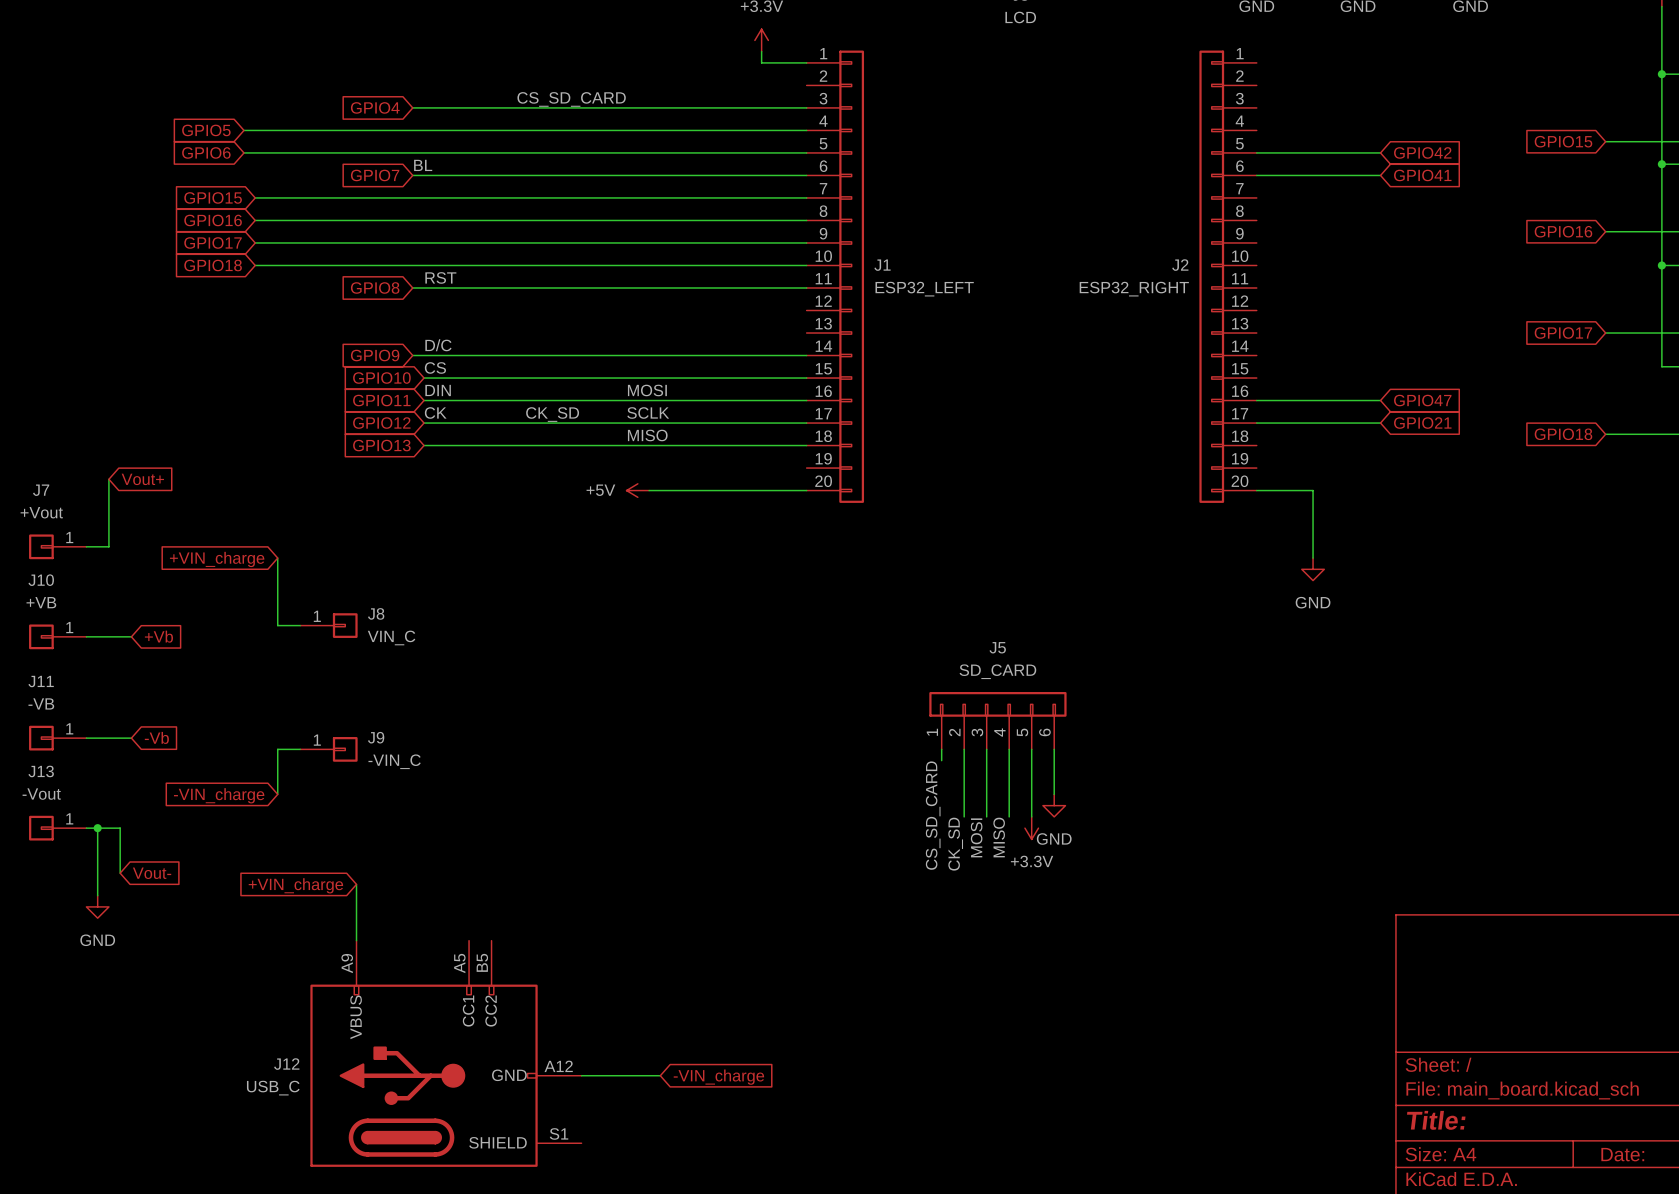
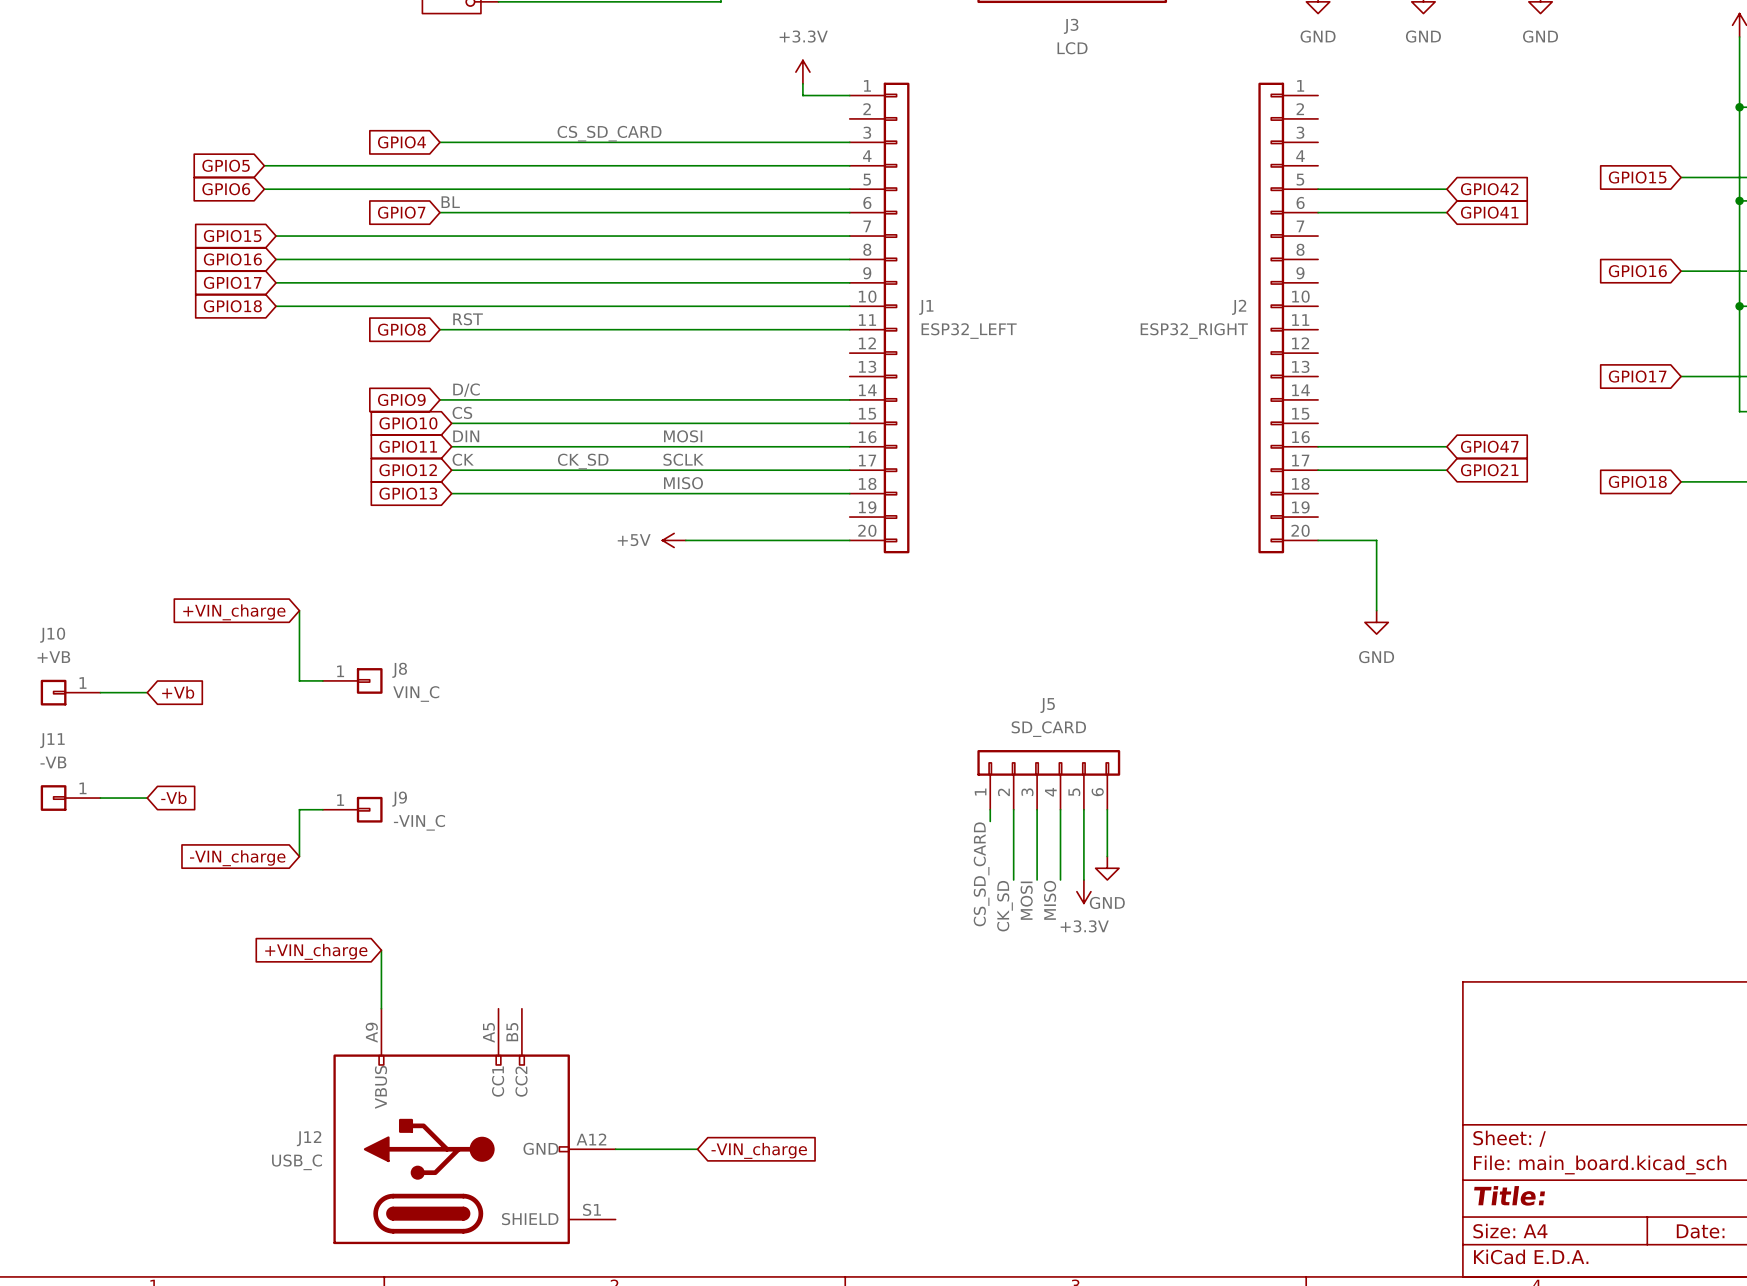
wire: (108, 479) (108, 546) (86, 546) -> none
global label: Vout+ (142, 479) -> none
J7: +Vout (57, 546) -> none
J13: -Vout (57, 828) -> none
wire: (86, 828) (120, 828) (120, 873) -> none
wire: (97, 828) (97, 895) -> none
junction: (97, 828) -> none
global label: Vout- (152, 873) -> none
power symbol: GND (97, 906) -> none

